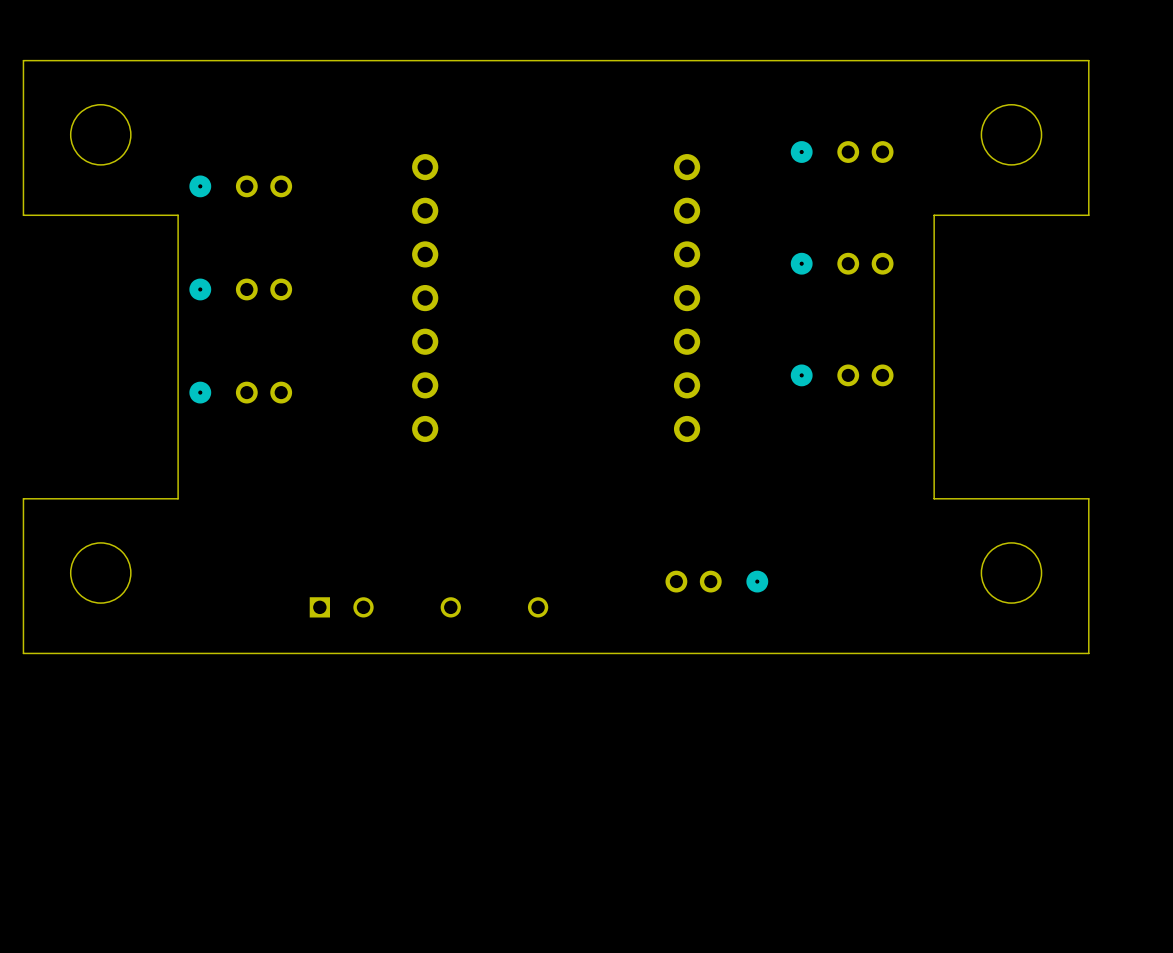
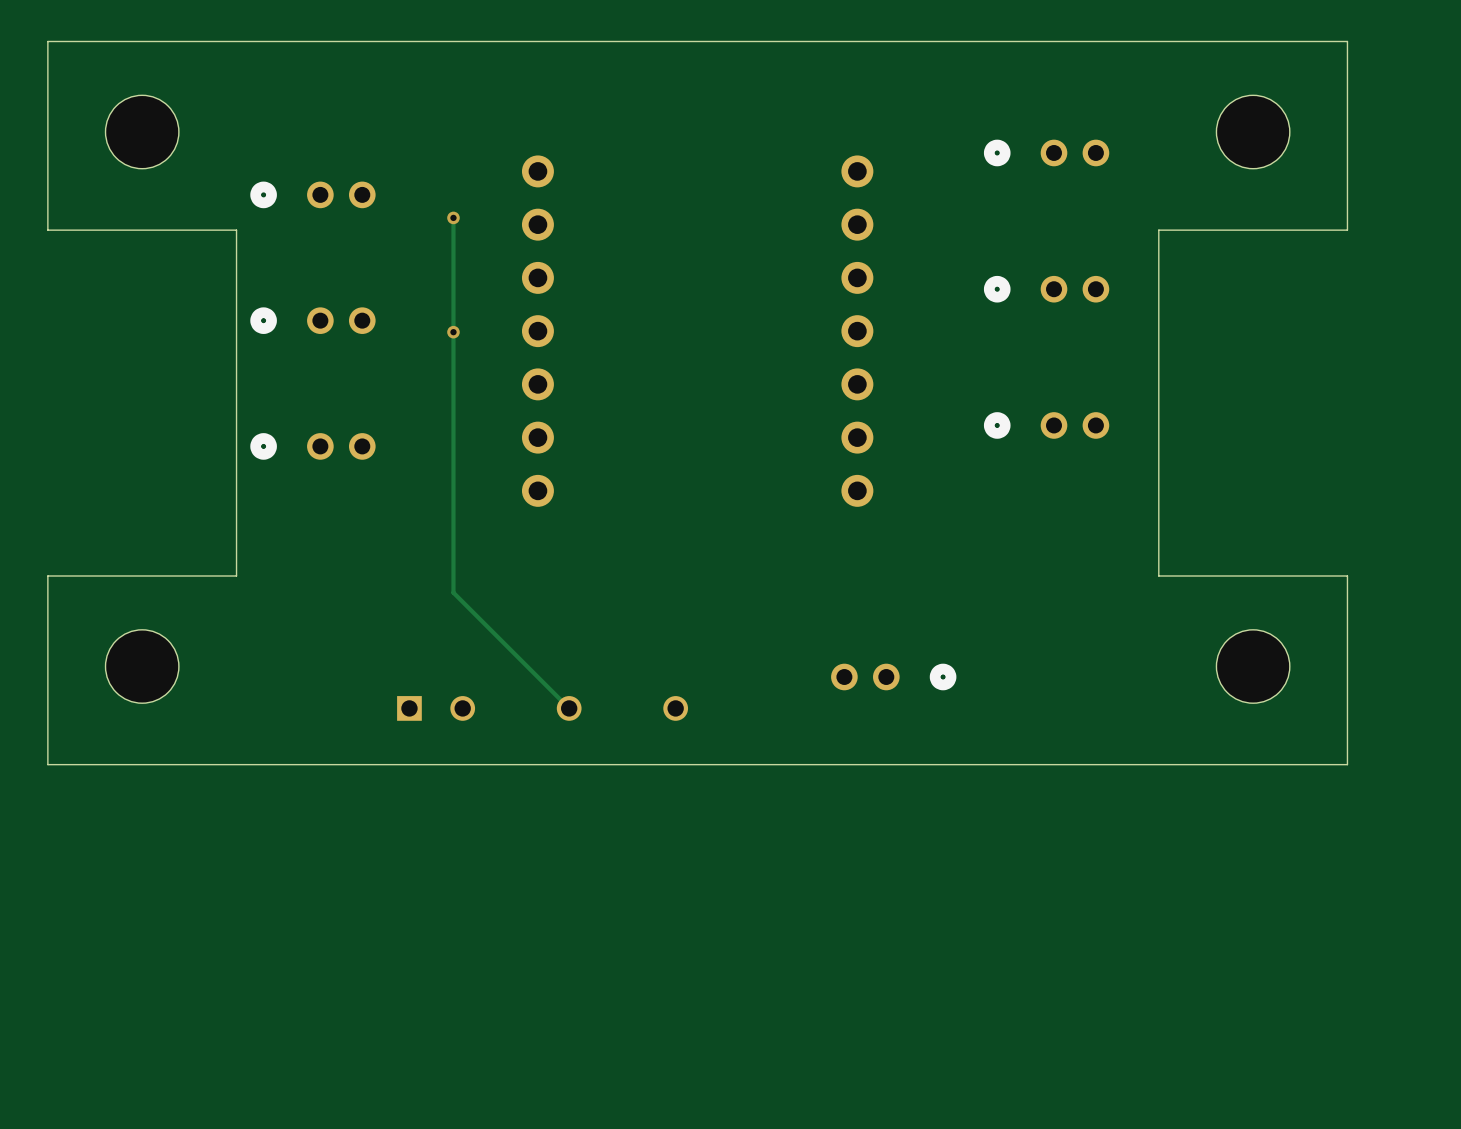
track: none -> (453, 217) (453, 592) (569, 708)
via: none -> (453, 217)
via: none -> (453, 332)

